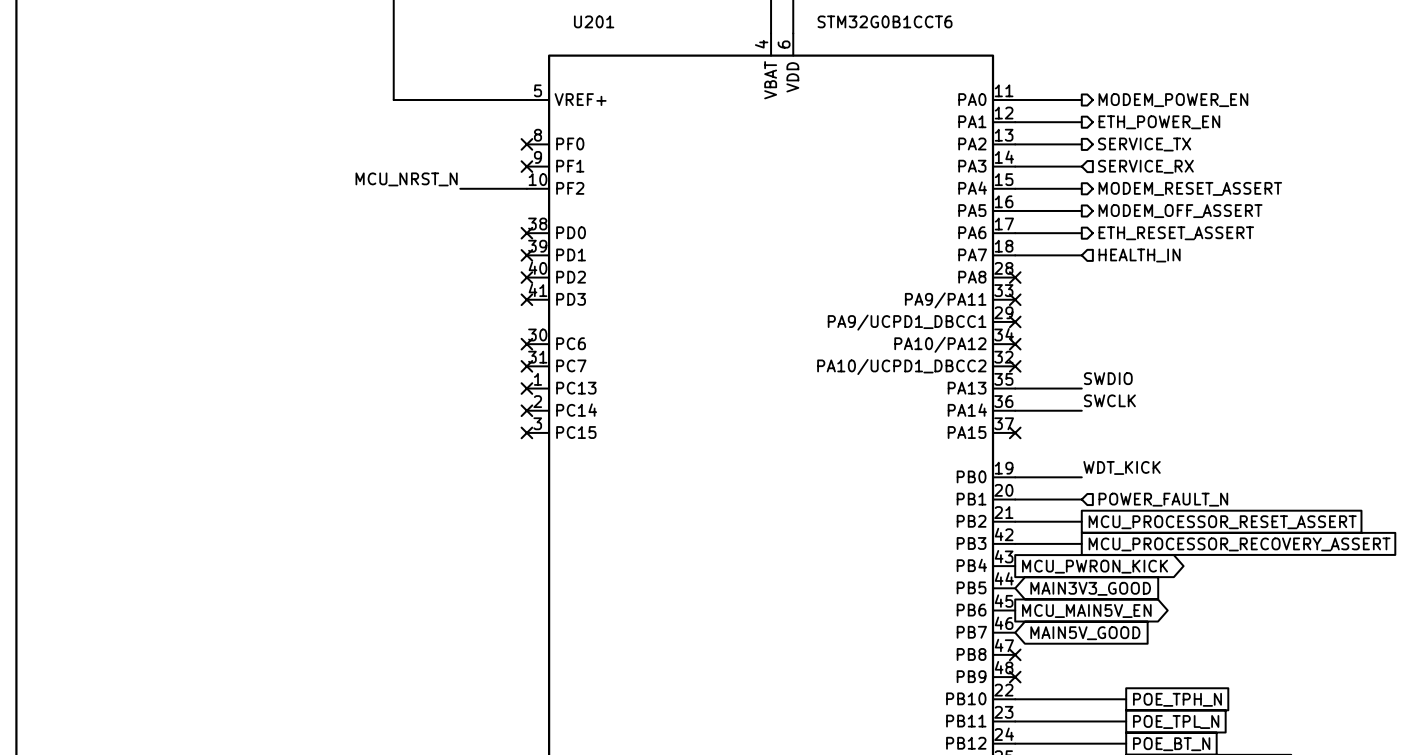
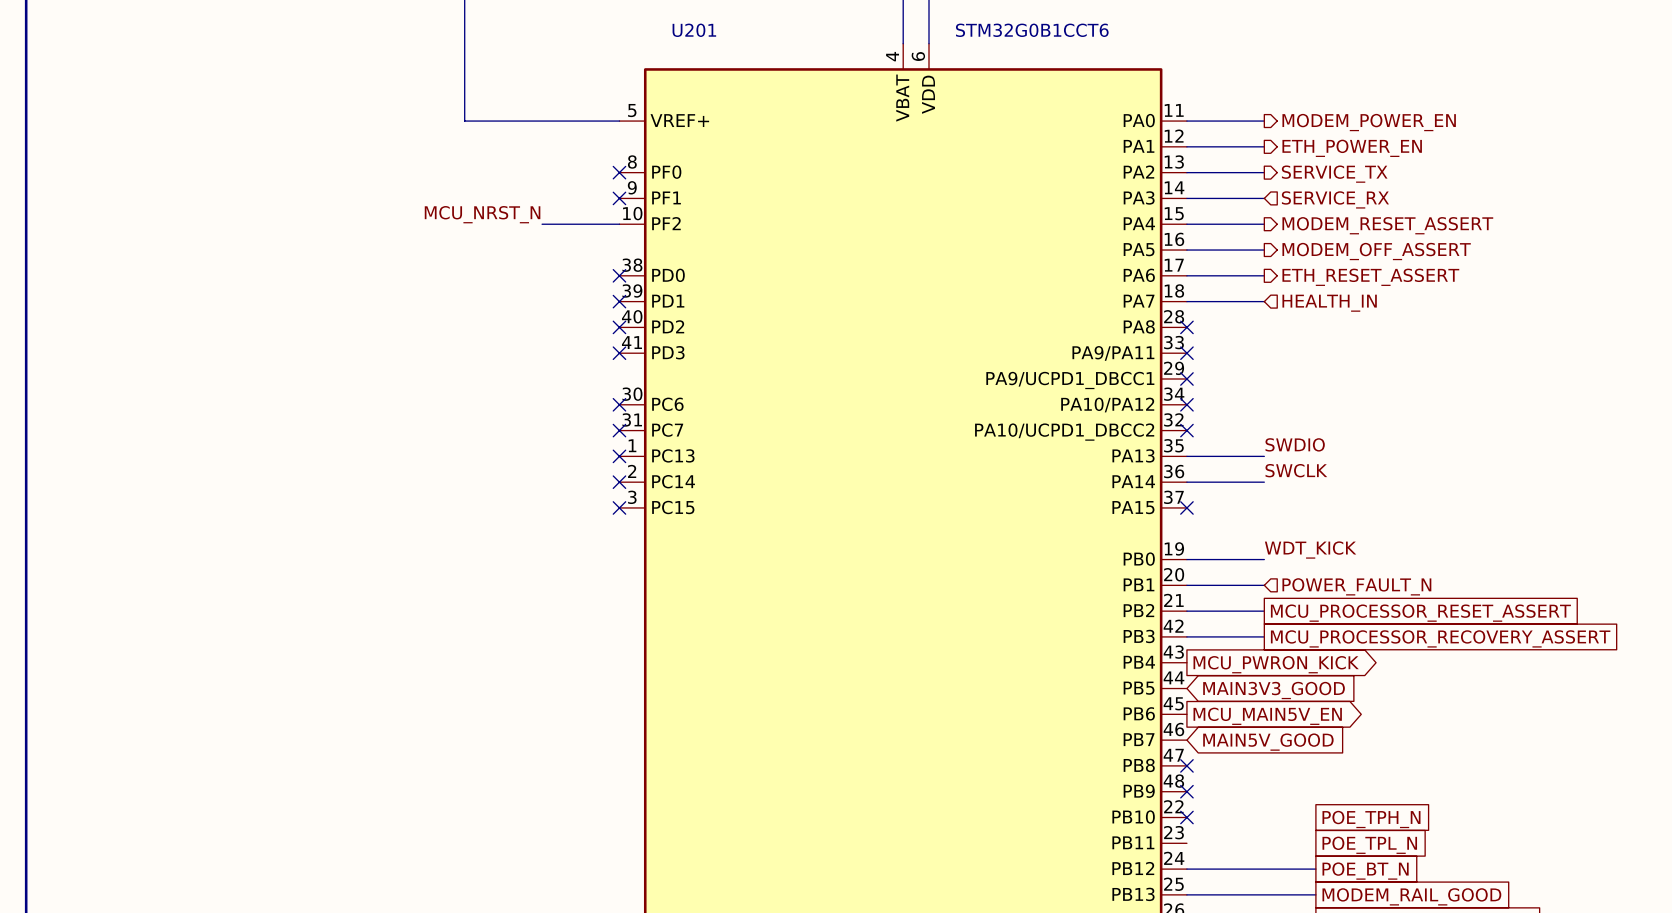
wire: (1015, 699) (1126, 699) -> none
no-connect mark: none -> (1186, 817)
wire: (1015, 721) (1126, 721) -> none

